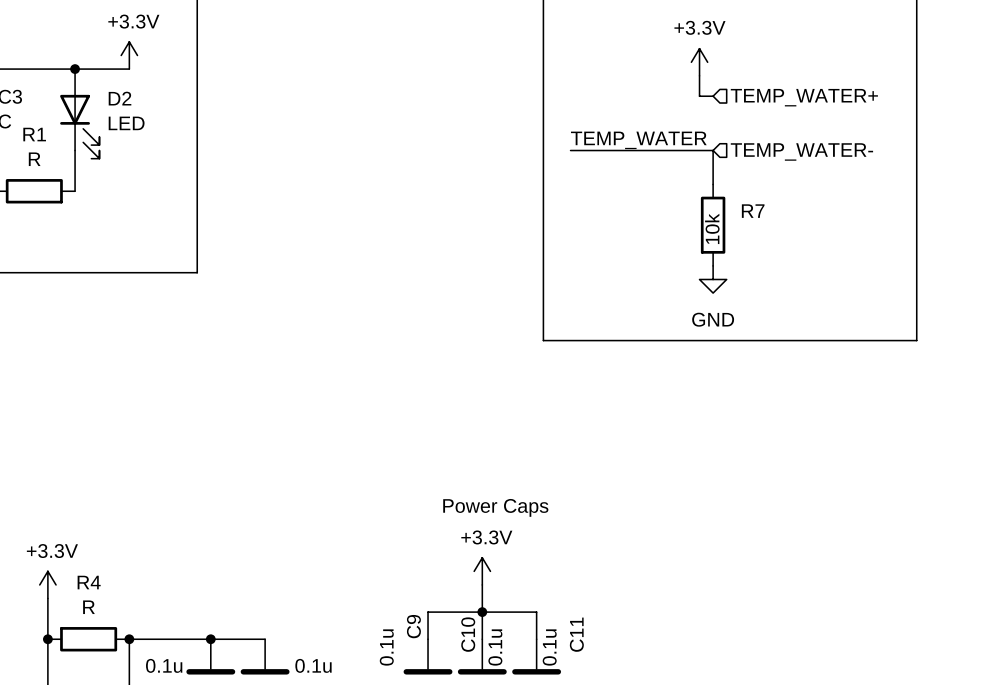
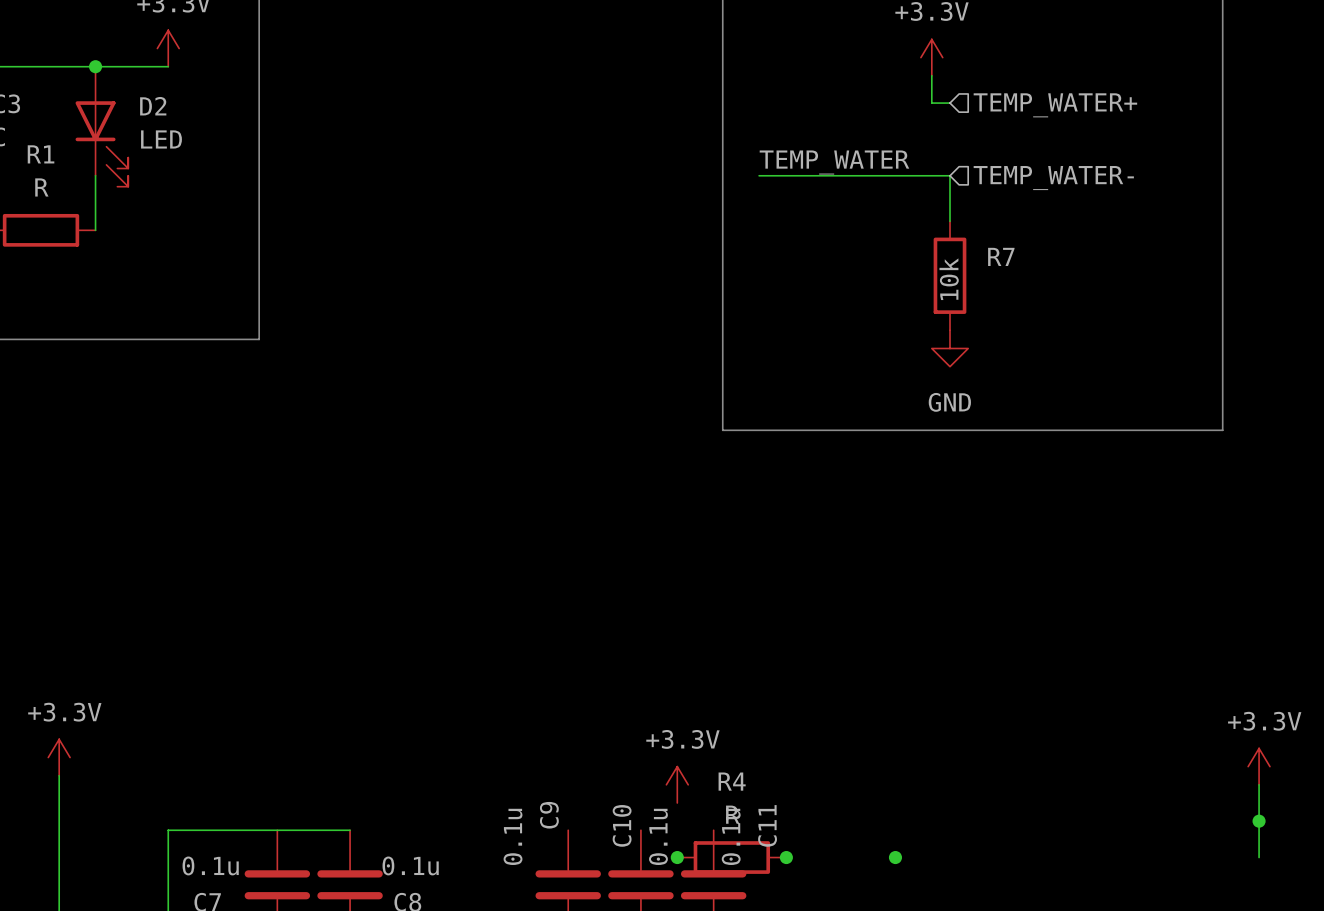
text: Power Caps (495, 507) -> none
power symbol position: +3.3V (482, 571) -> +3.3V (677, 784)
wire: (482, 584) (482, 639) -> none
power symbol: none -> +3.3V (1259, 766)
wire: none -> (1259, 784) (1259, 857)
junction: (482, 612) -> none
junction: none -> (1259, 821)
junction: (47, 639) -> none
R4 position: (88, 639) -> (731, 857)
junction: (129, 639) -> none
junction: (210, 639) -> none
wire: (428, 639) (428, 612) (536, 612) (536, 639) -> none
junction: none -> (677, 857)
junction: none -> (786, 857)
junction: none -> (895, 857)

